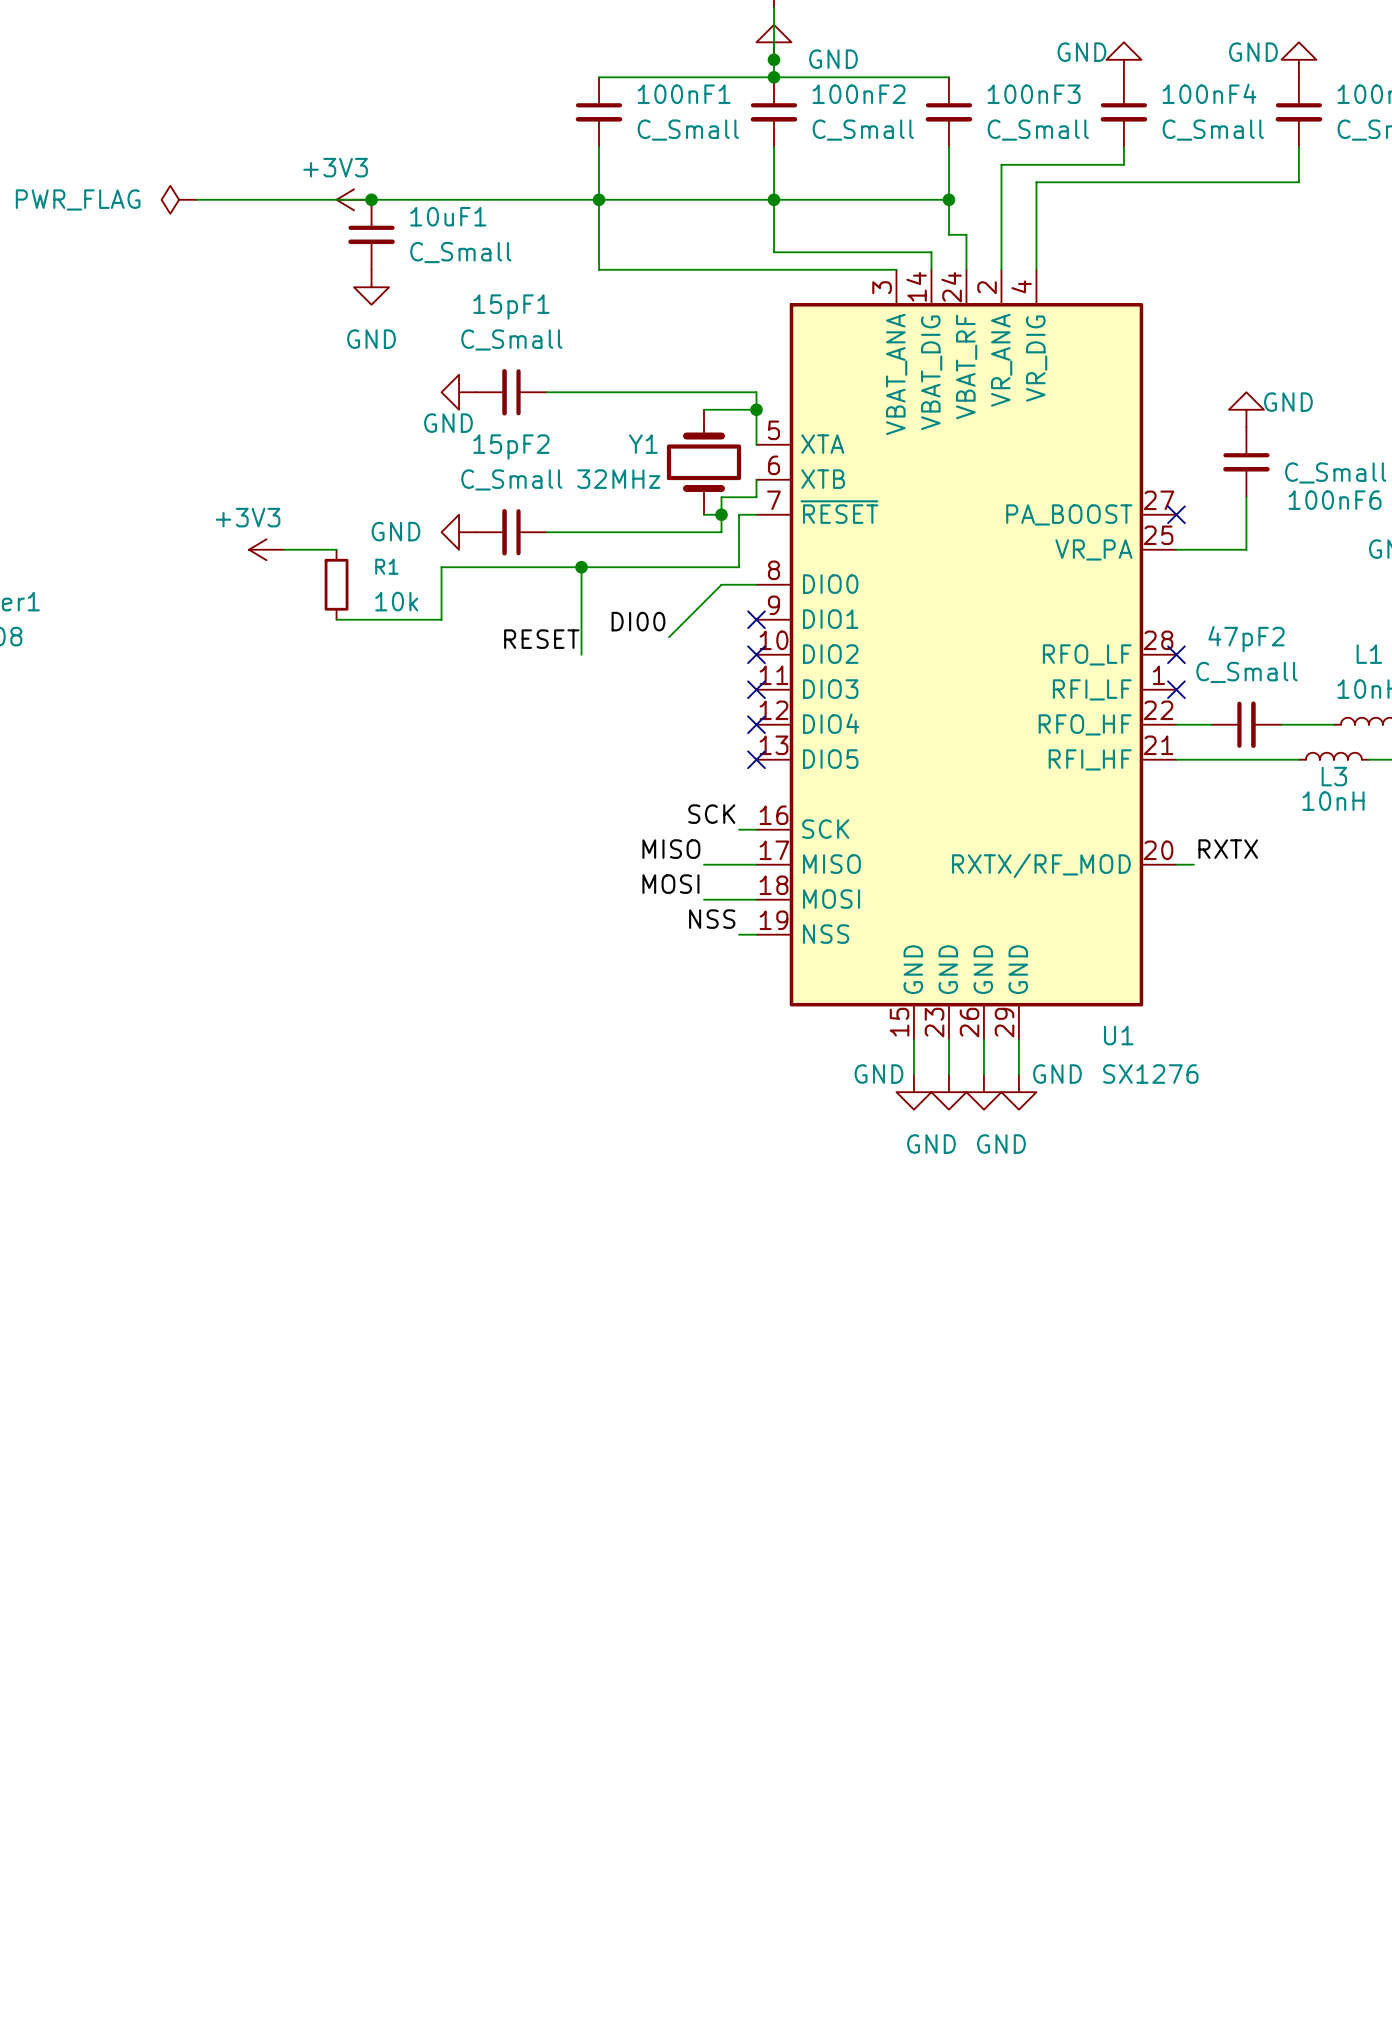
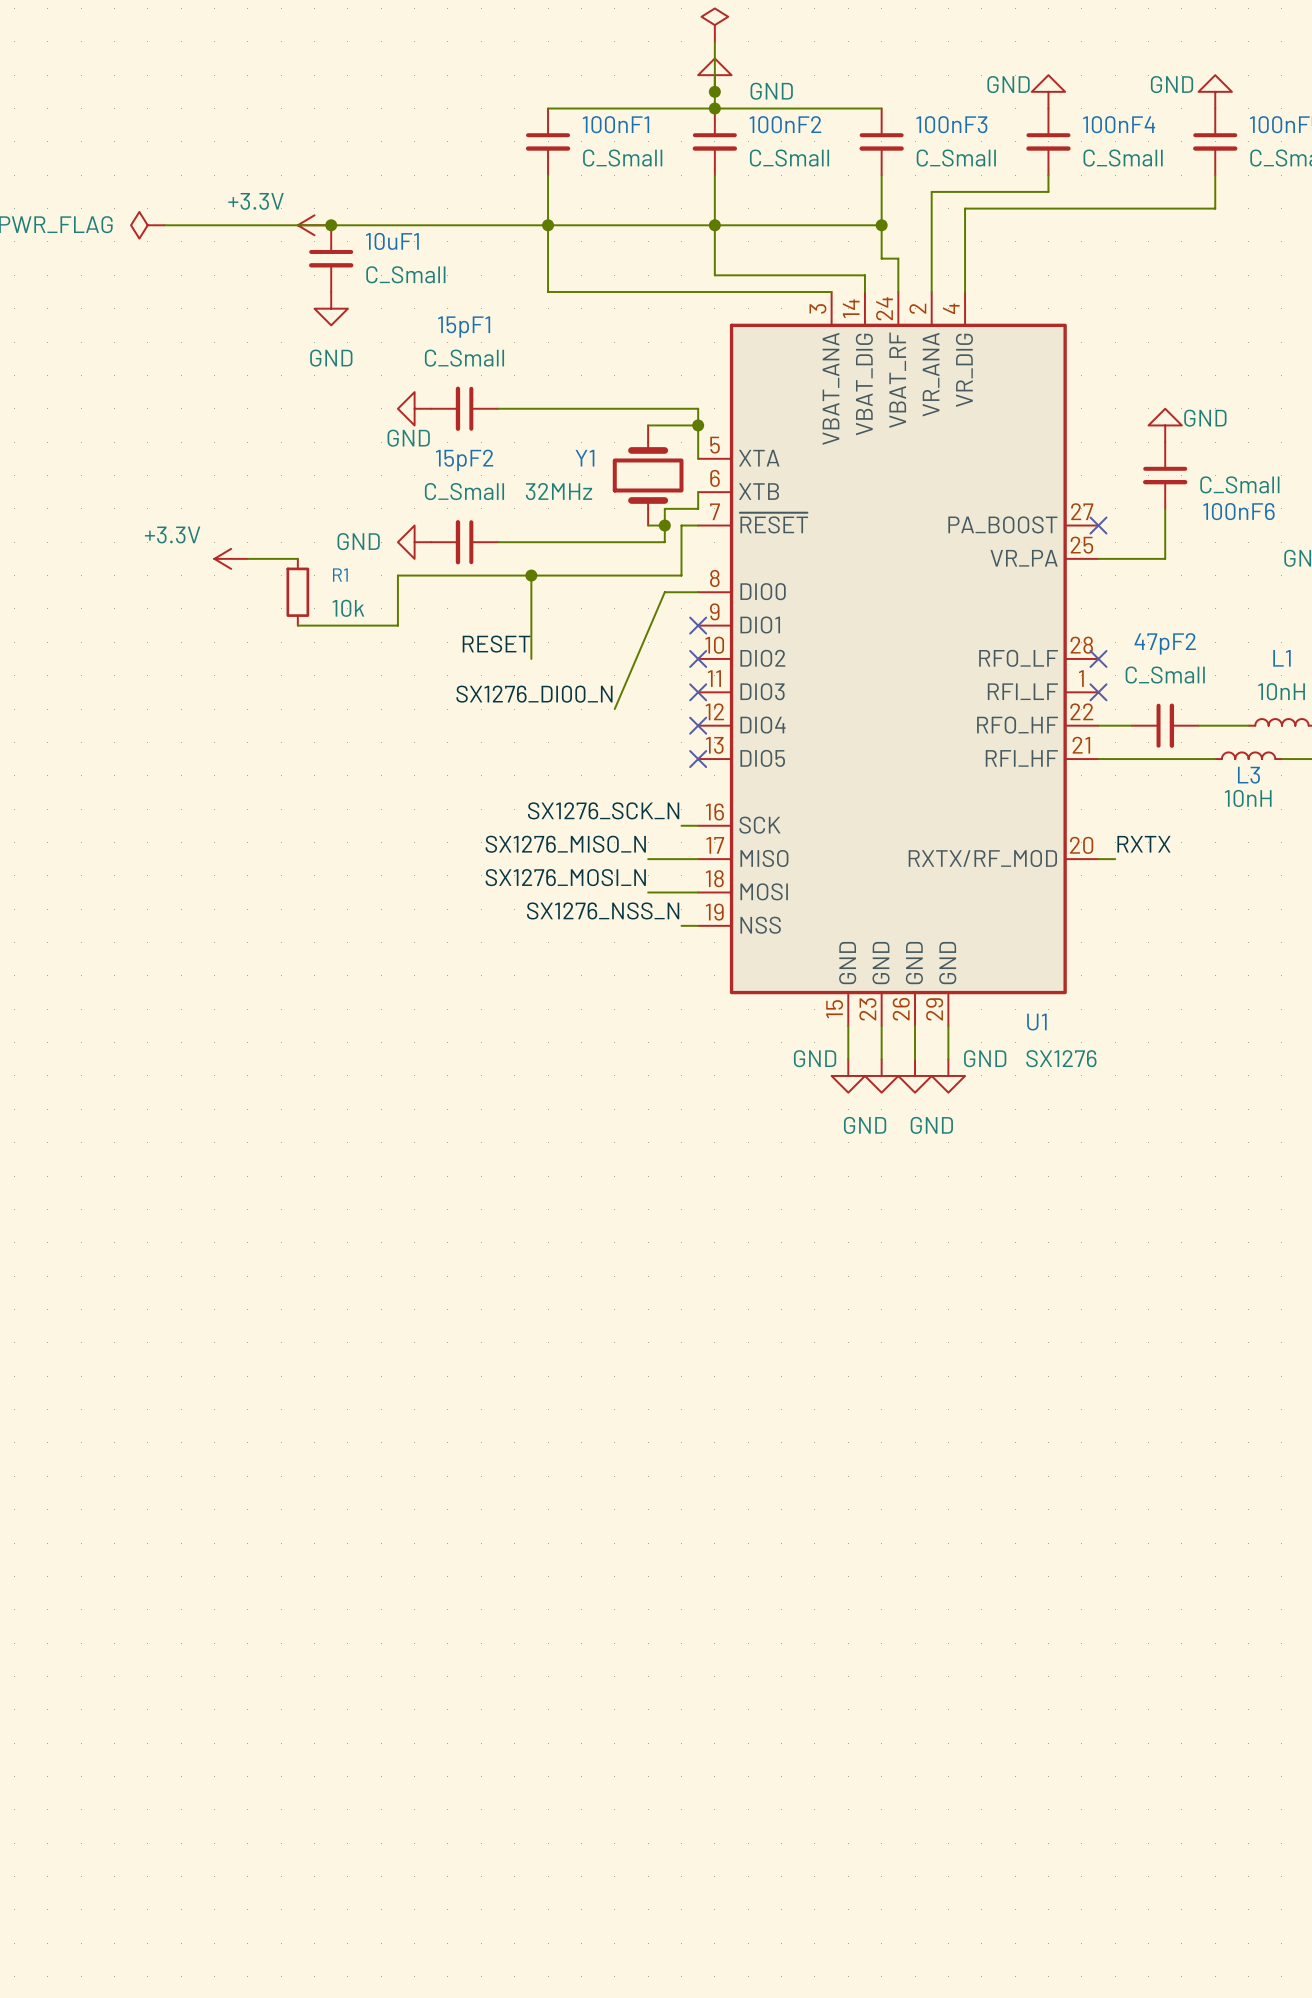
power symbol: +3V3 (354, 199) -> +3.3V (314, 225)
power symbol: +3V3 (266, 549) -> +3.3V (231, 558)
wire: (721, 584) (669, 637) -> (664, 592) (614, 709)
label: DI00 (638, 621) -> none
label: none -> SX1276_DI00_N (534, 694)
label: SCK (711, 814) -> SX1276_SCK_N (603, 810)
label: MISO (671, 849) -> SX1276_MISO_N (565, 844)
label: MOSI (670, 884) -> SX1276_MOSI_N (565, 877)
label: NSS (712, 919) -> SX1276_NSS_N (603, 910)

